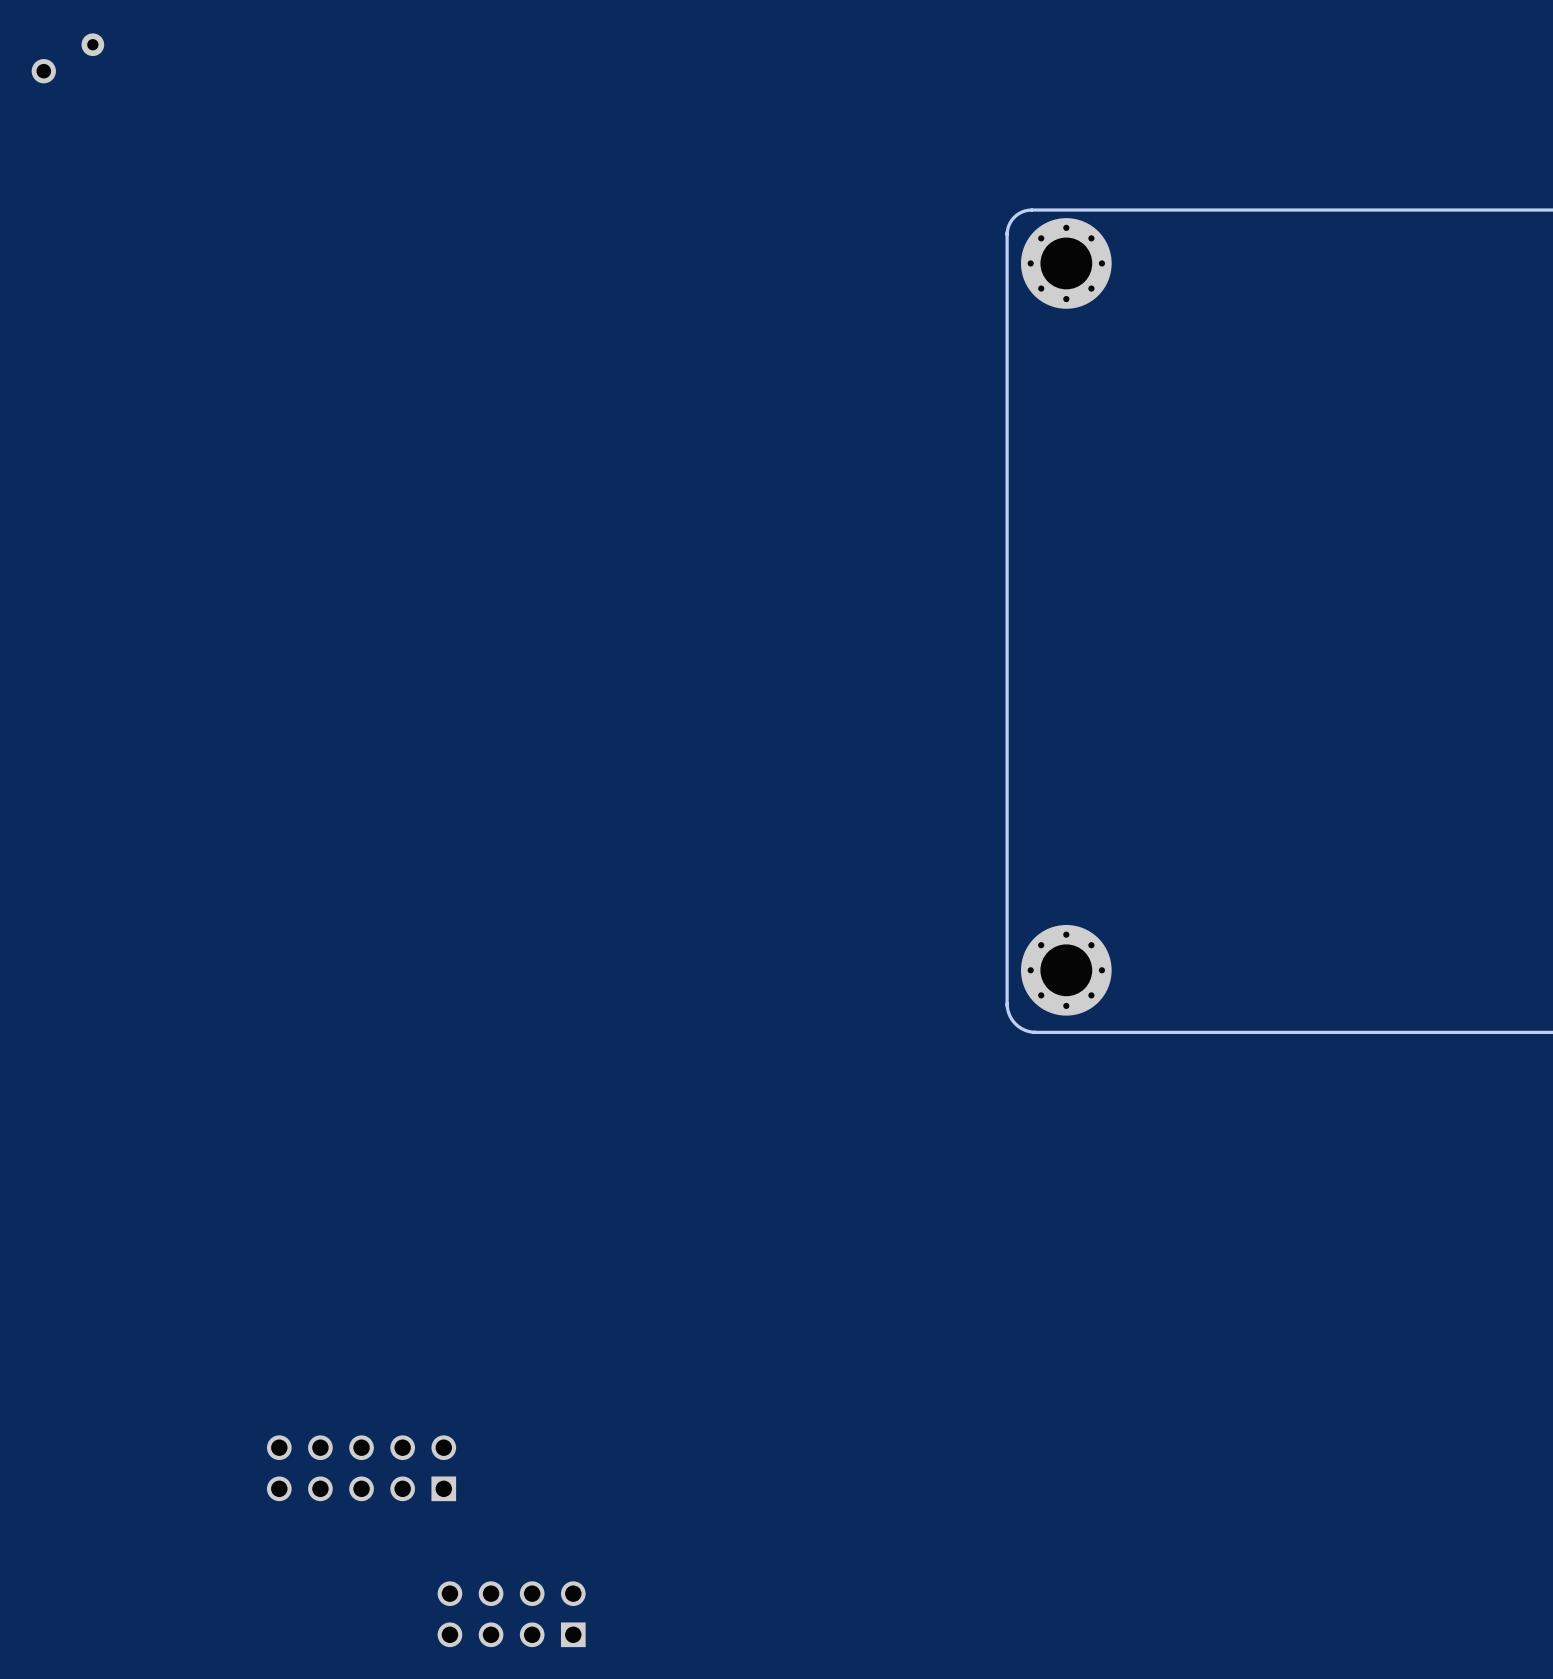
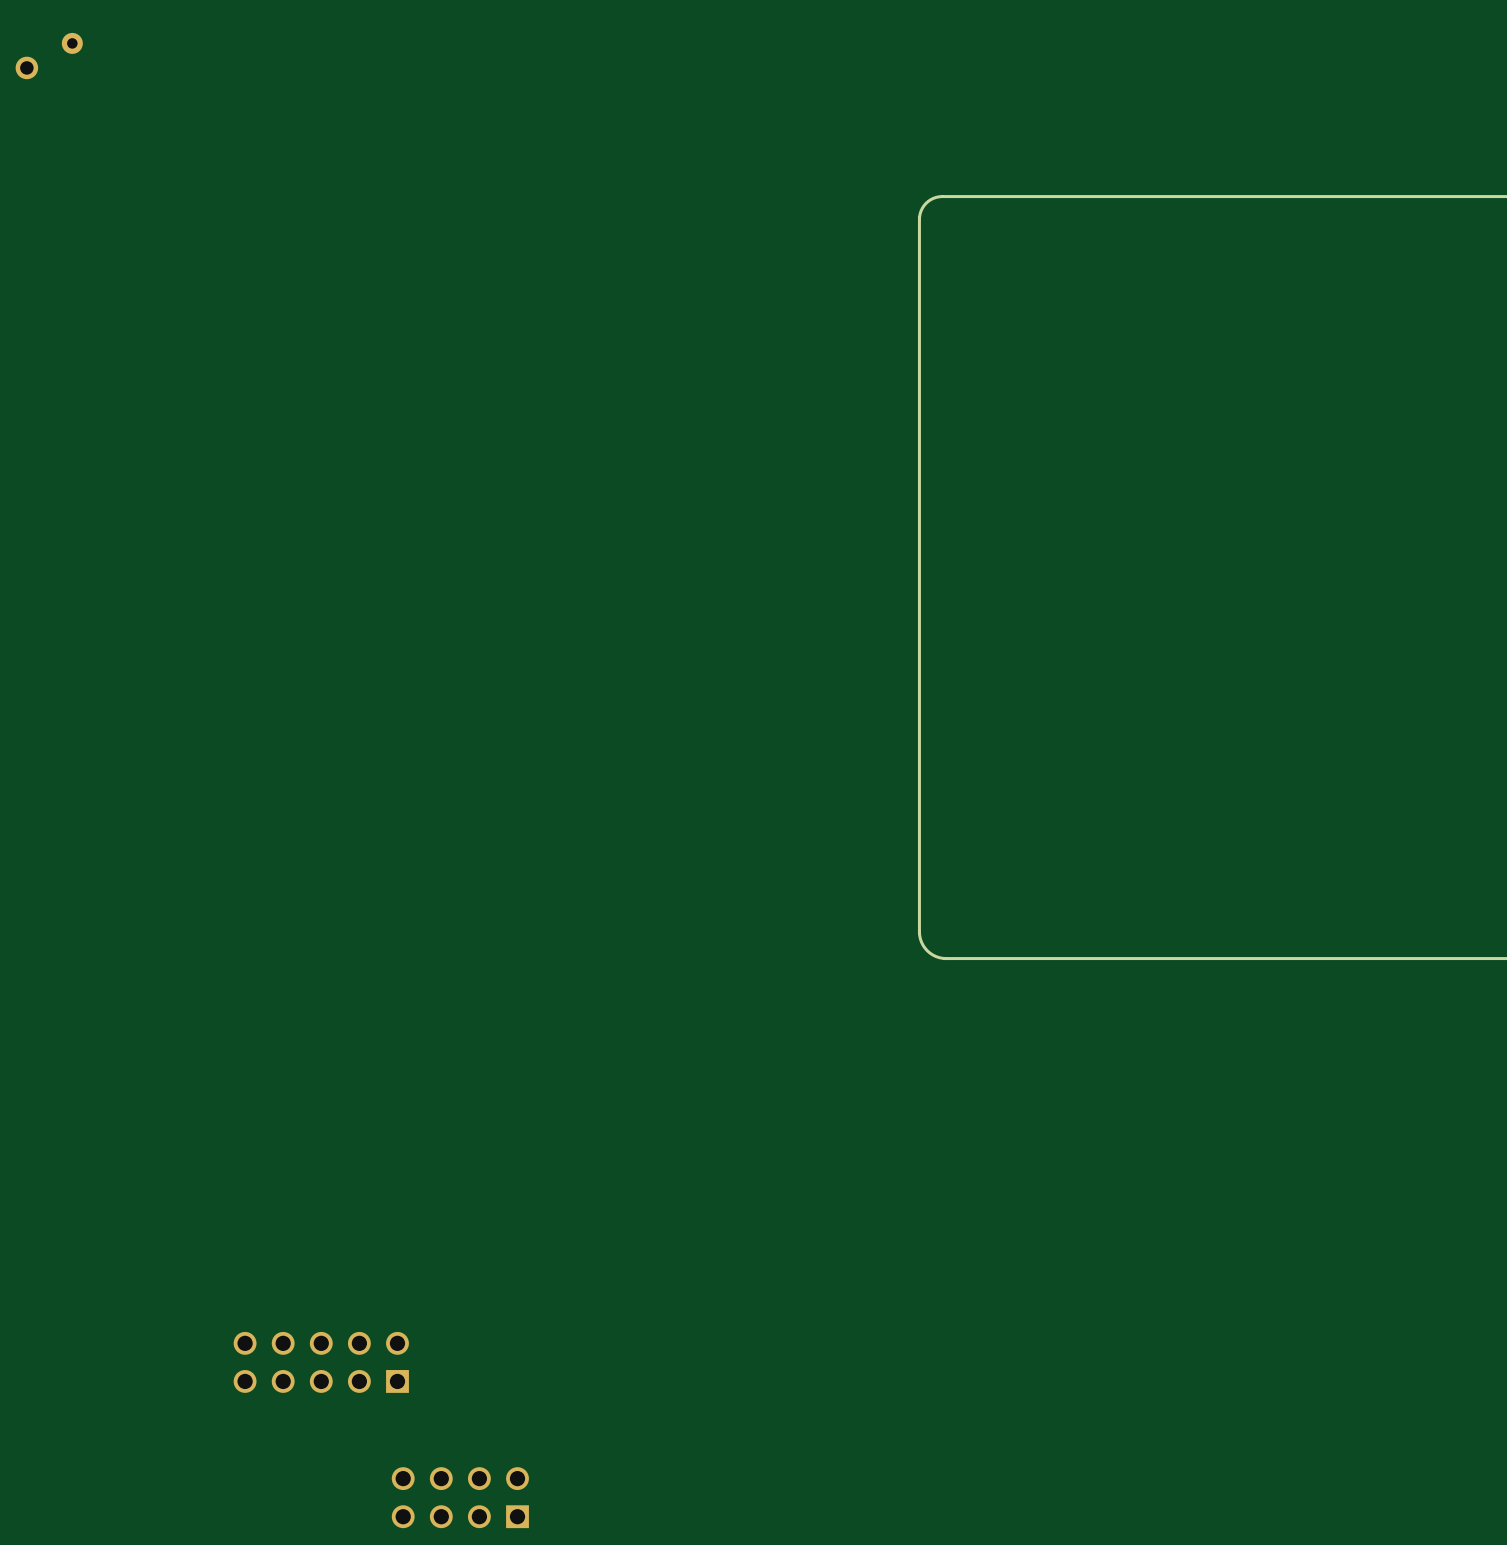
part: (1066, 263) -> none
part: (1066, 970) -> none

